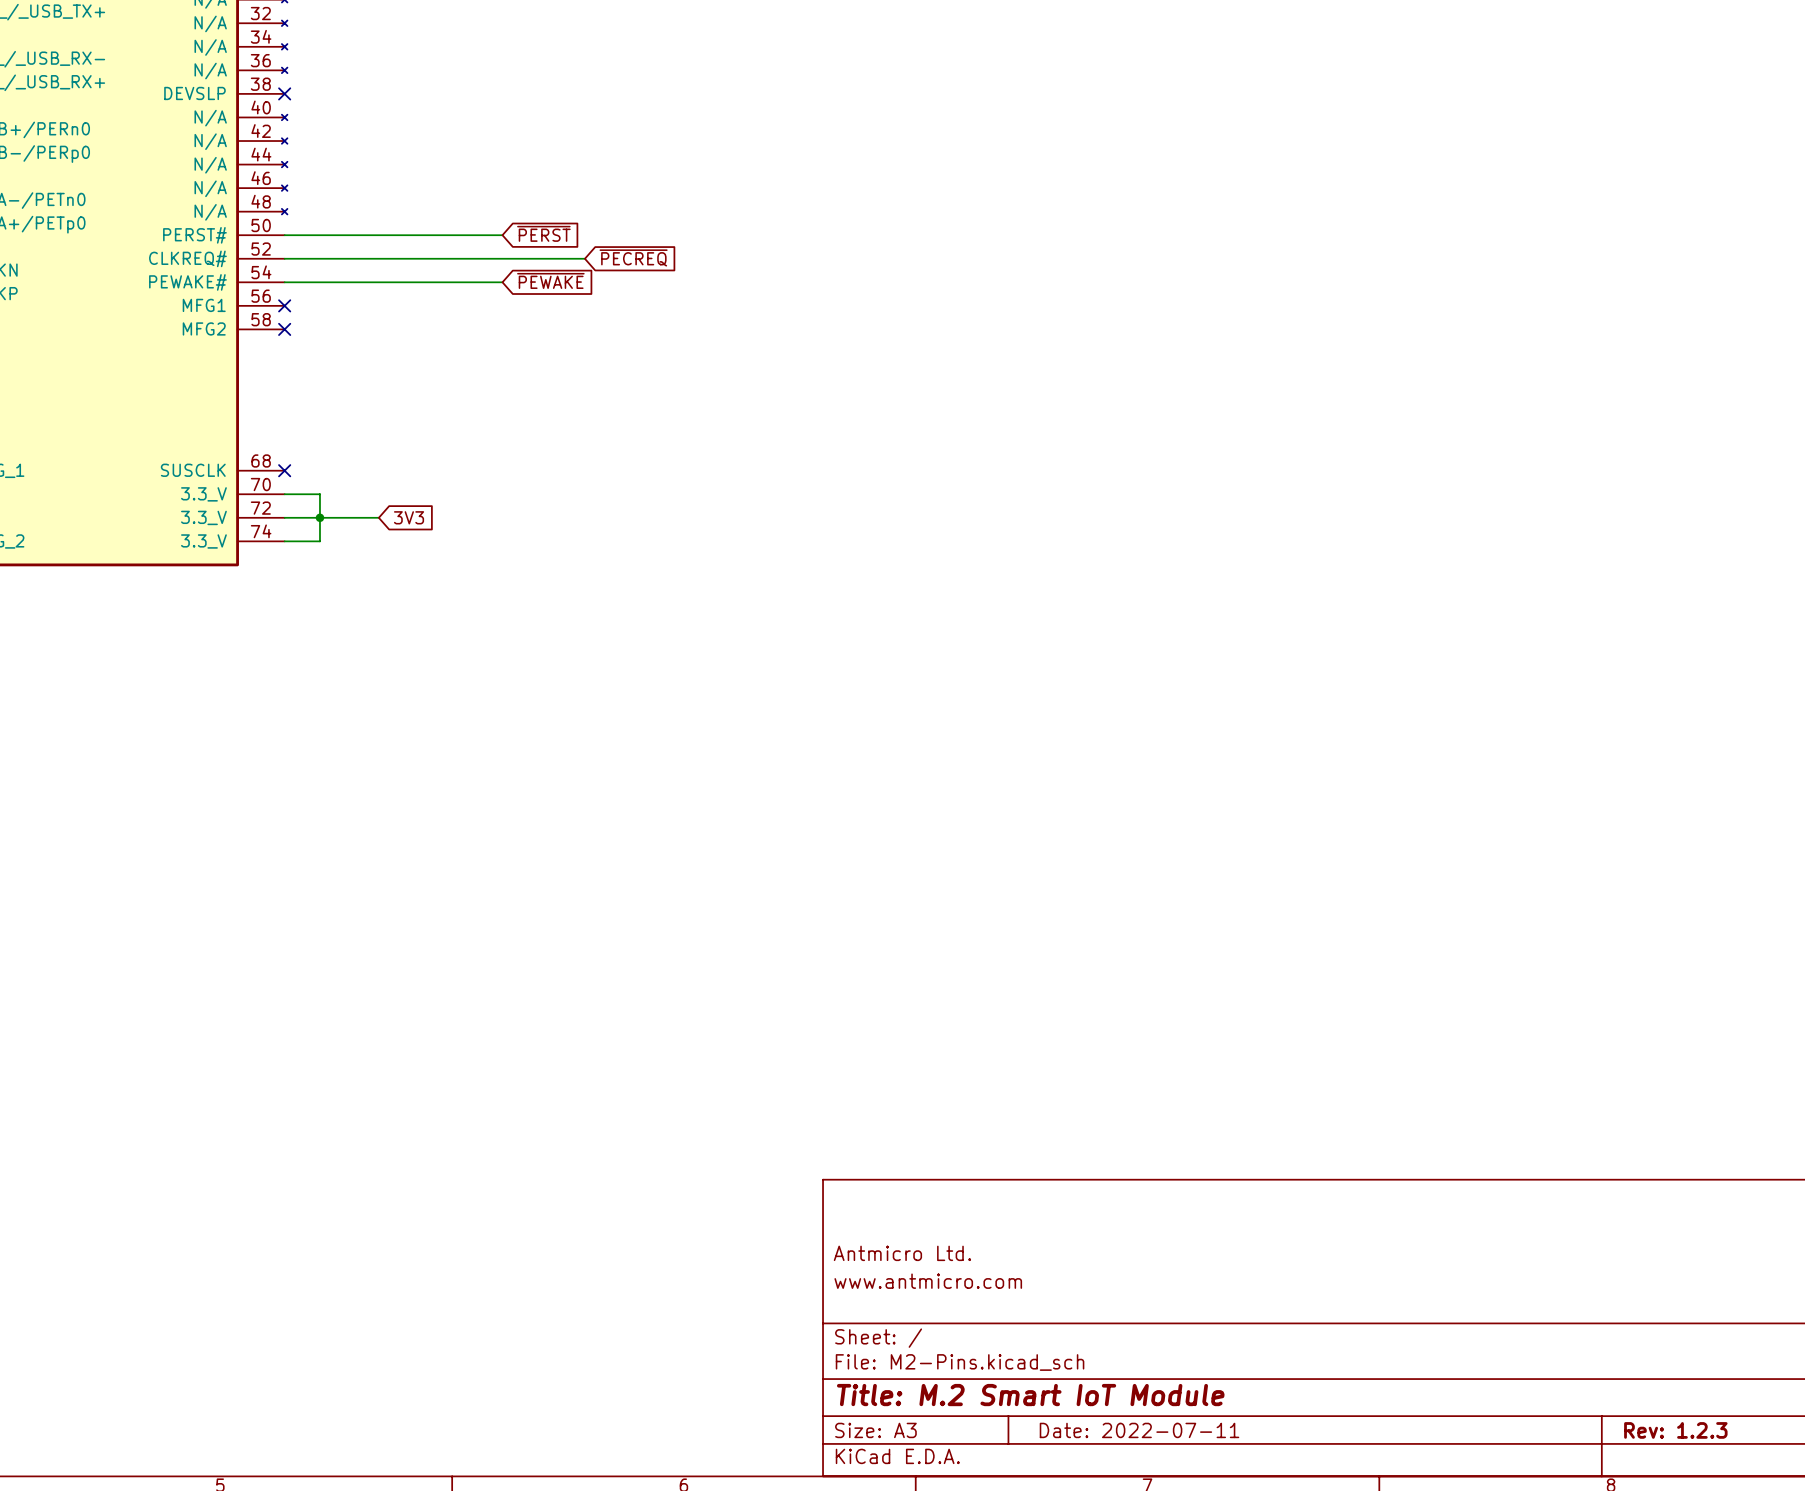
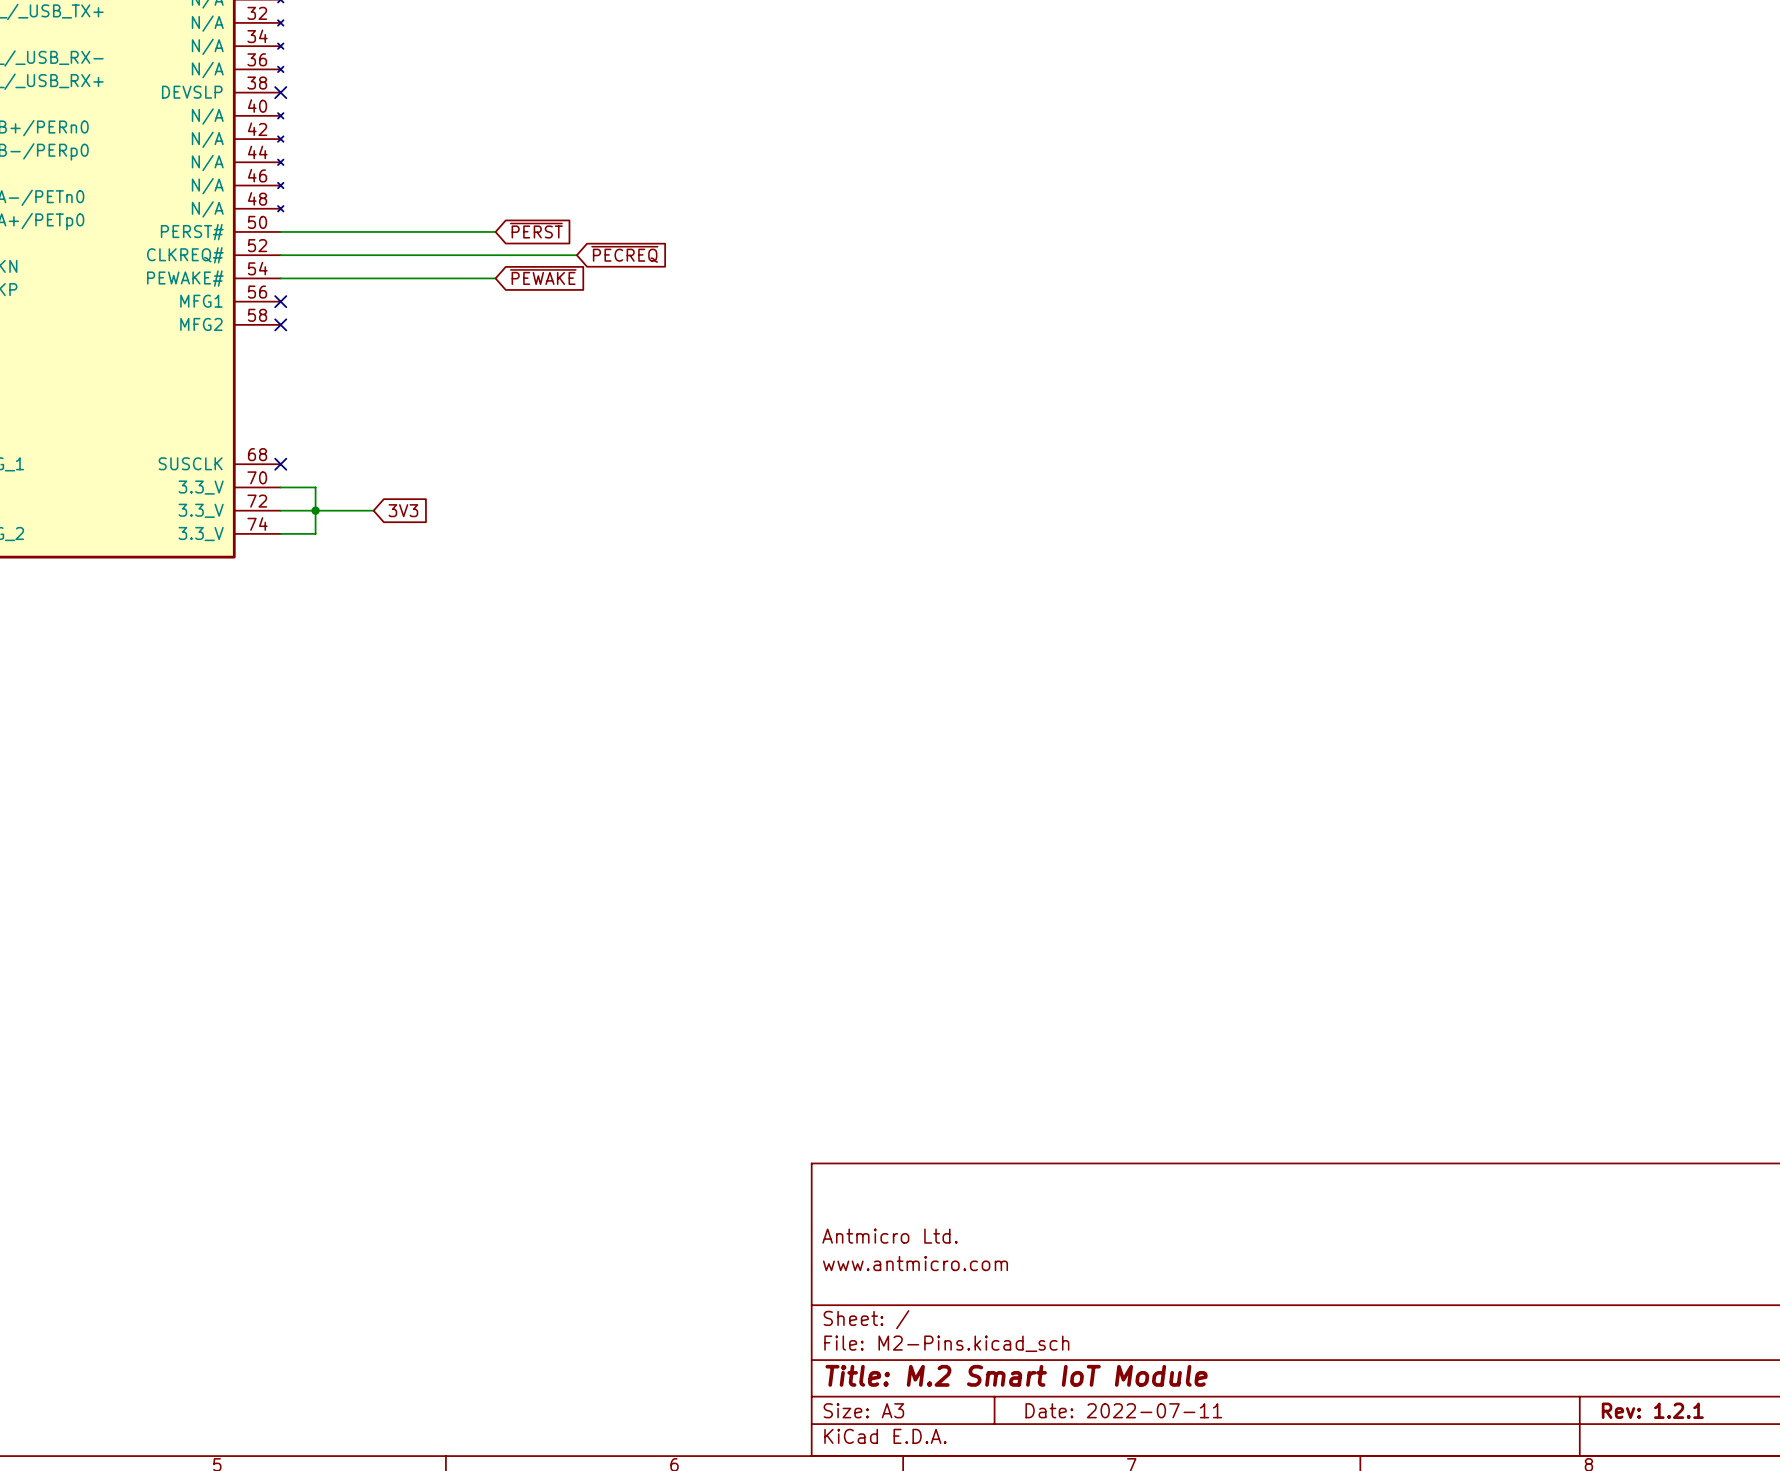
title block: Rev: 1.2.3 (1675, 1430) -> Rev: 1.2.1 (1652, 1410)

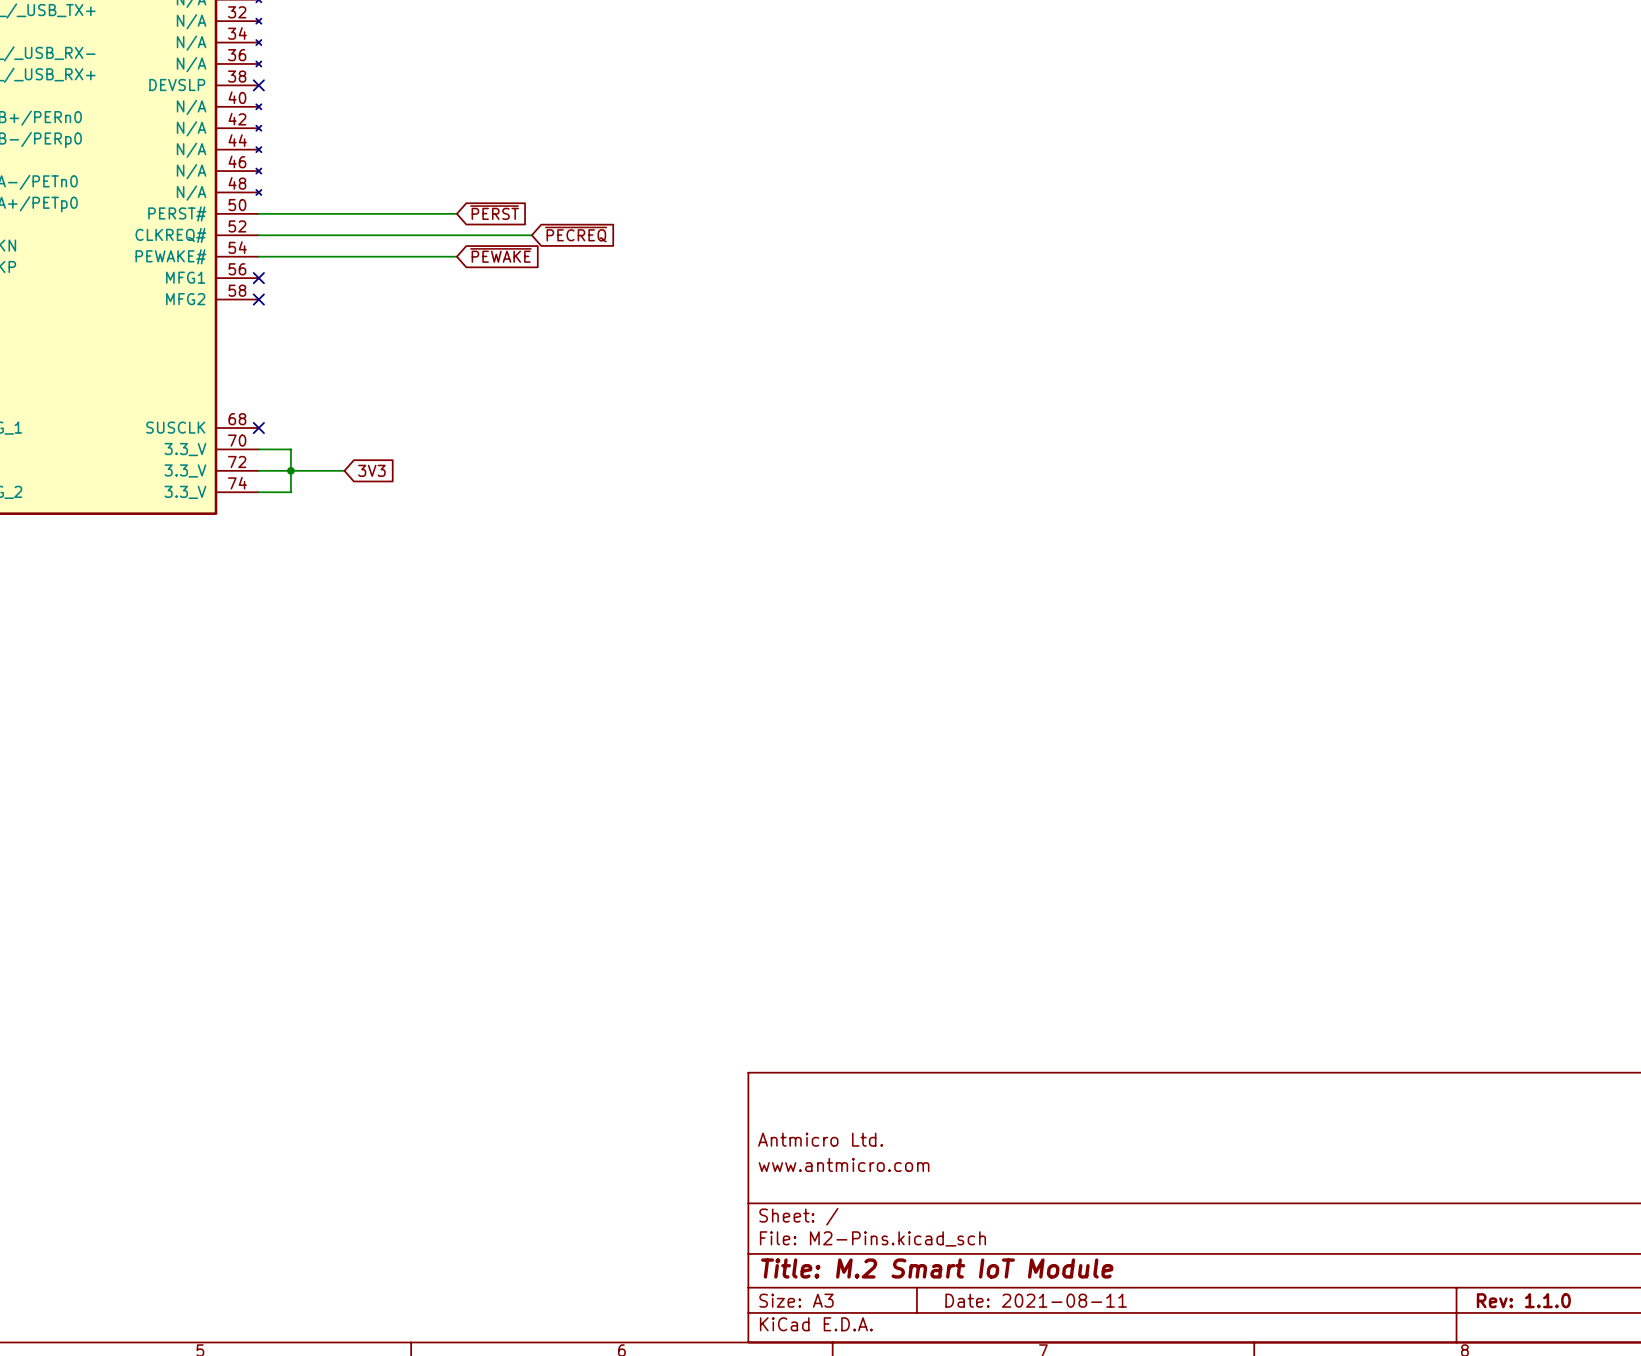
title block: Date: 2022-07-11 (1123, 1410) -> Date: 2021-08-11 (1036, 1300)
title block: Rev: 1.2.1 (1652, 1410) -> Rev: 1.1.0 (1523, 1300)

